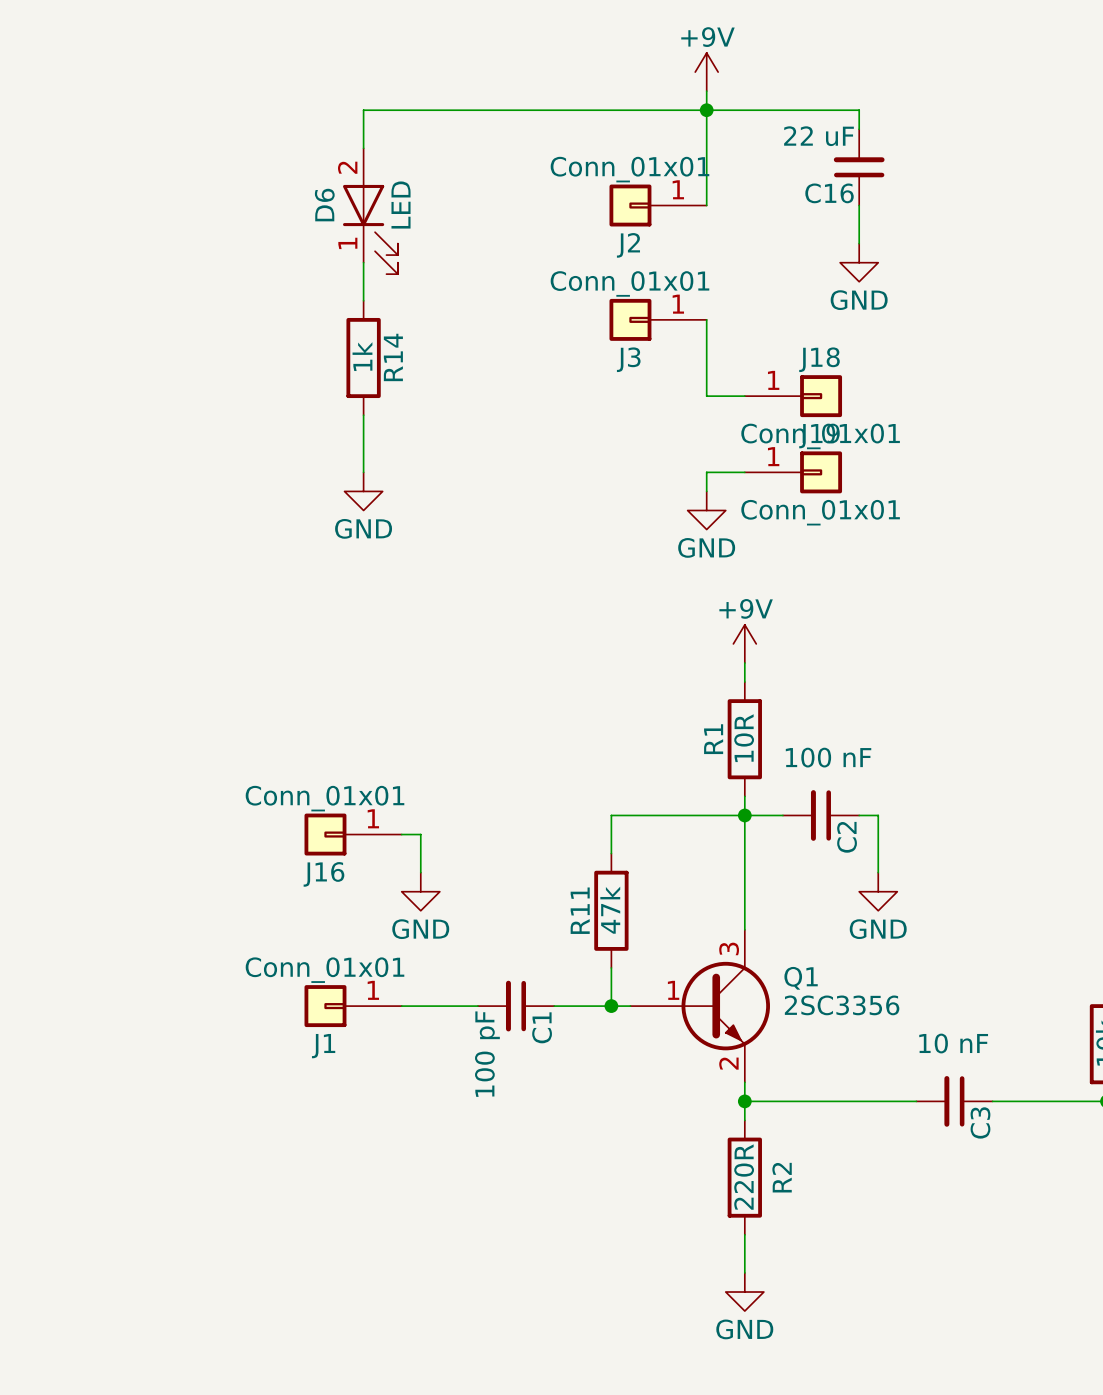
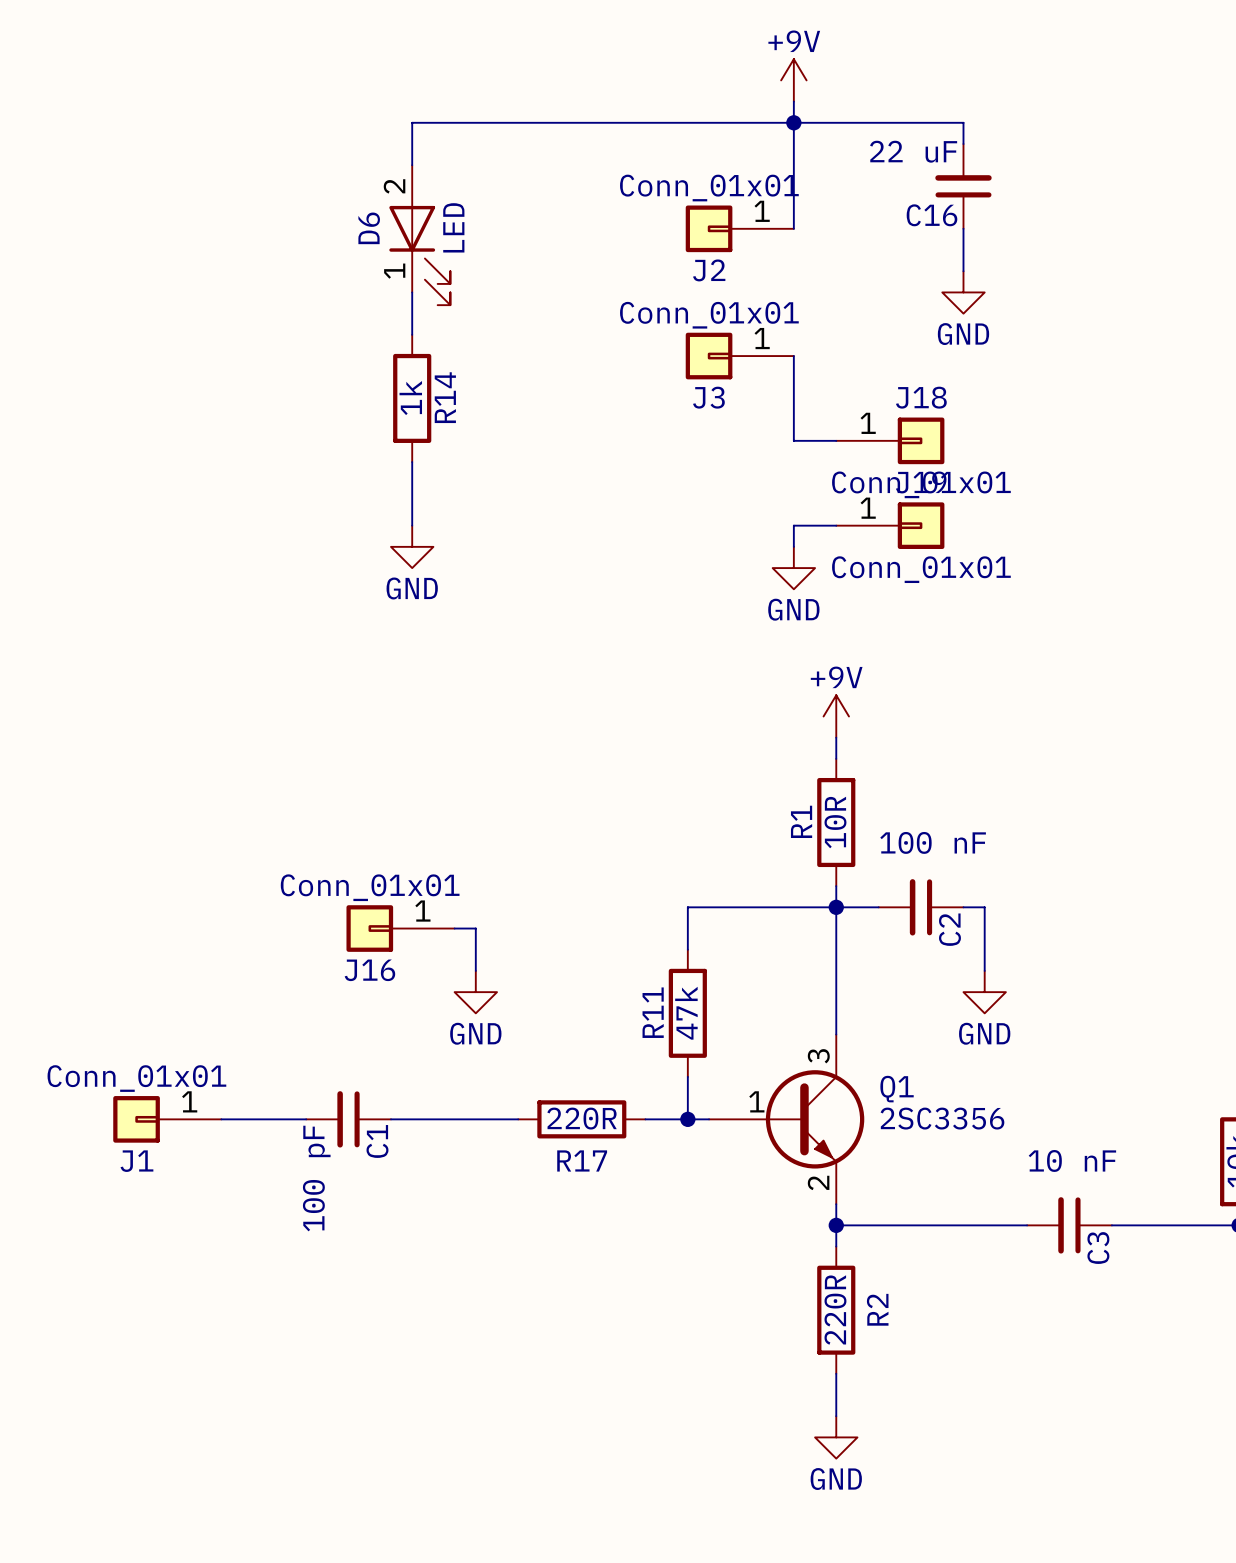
wire: none -> (221, 1119) (306, 1119)
J1 position: (353, 1006) -> (167, 1119)
C1 position: (516, 1006) -> (348, 1119)
R17: none -> 220R (581, 1119)

